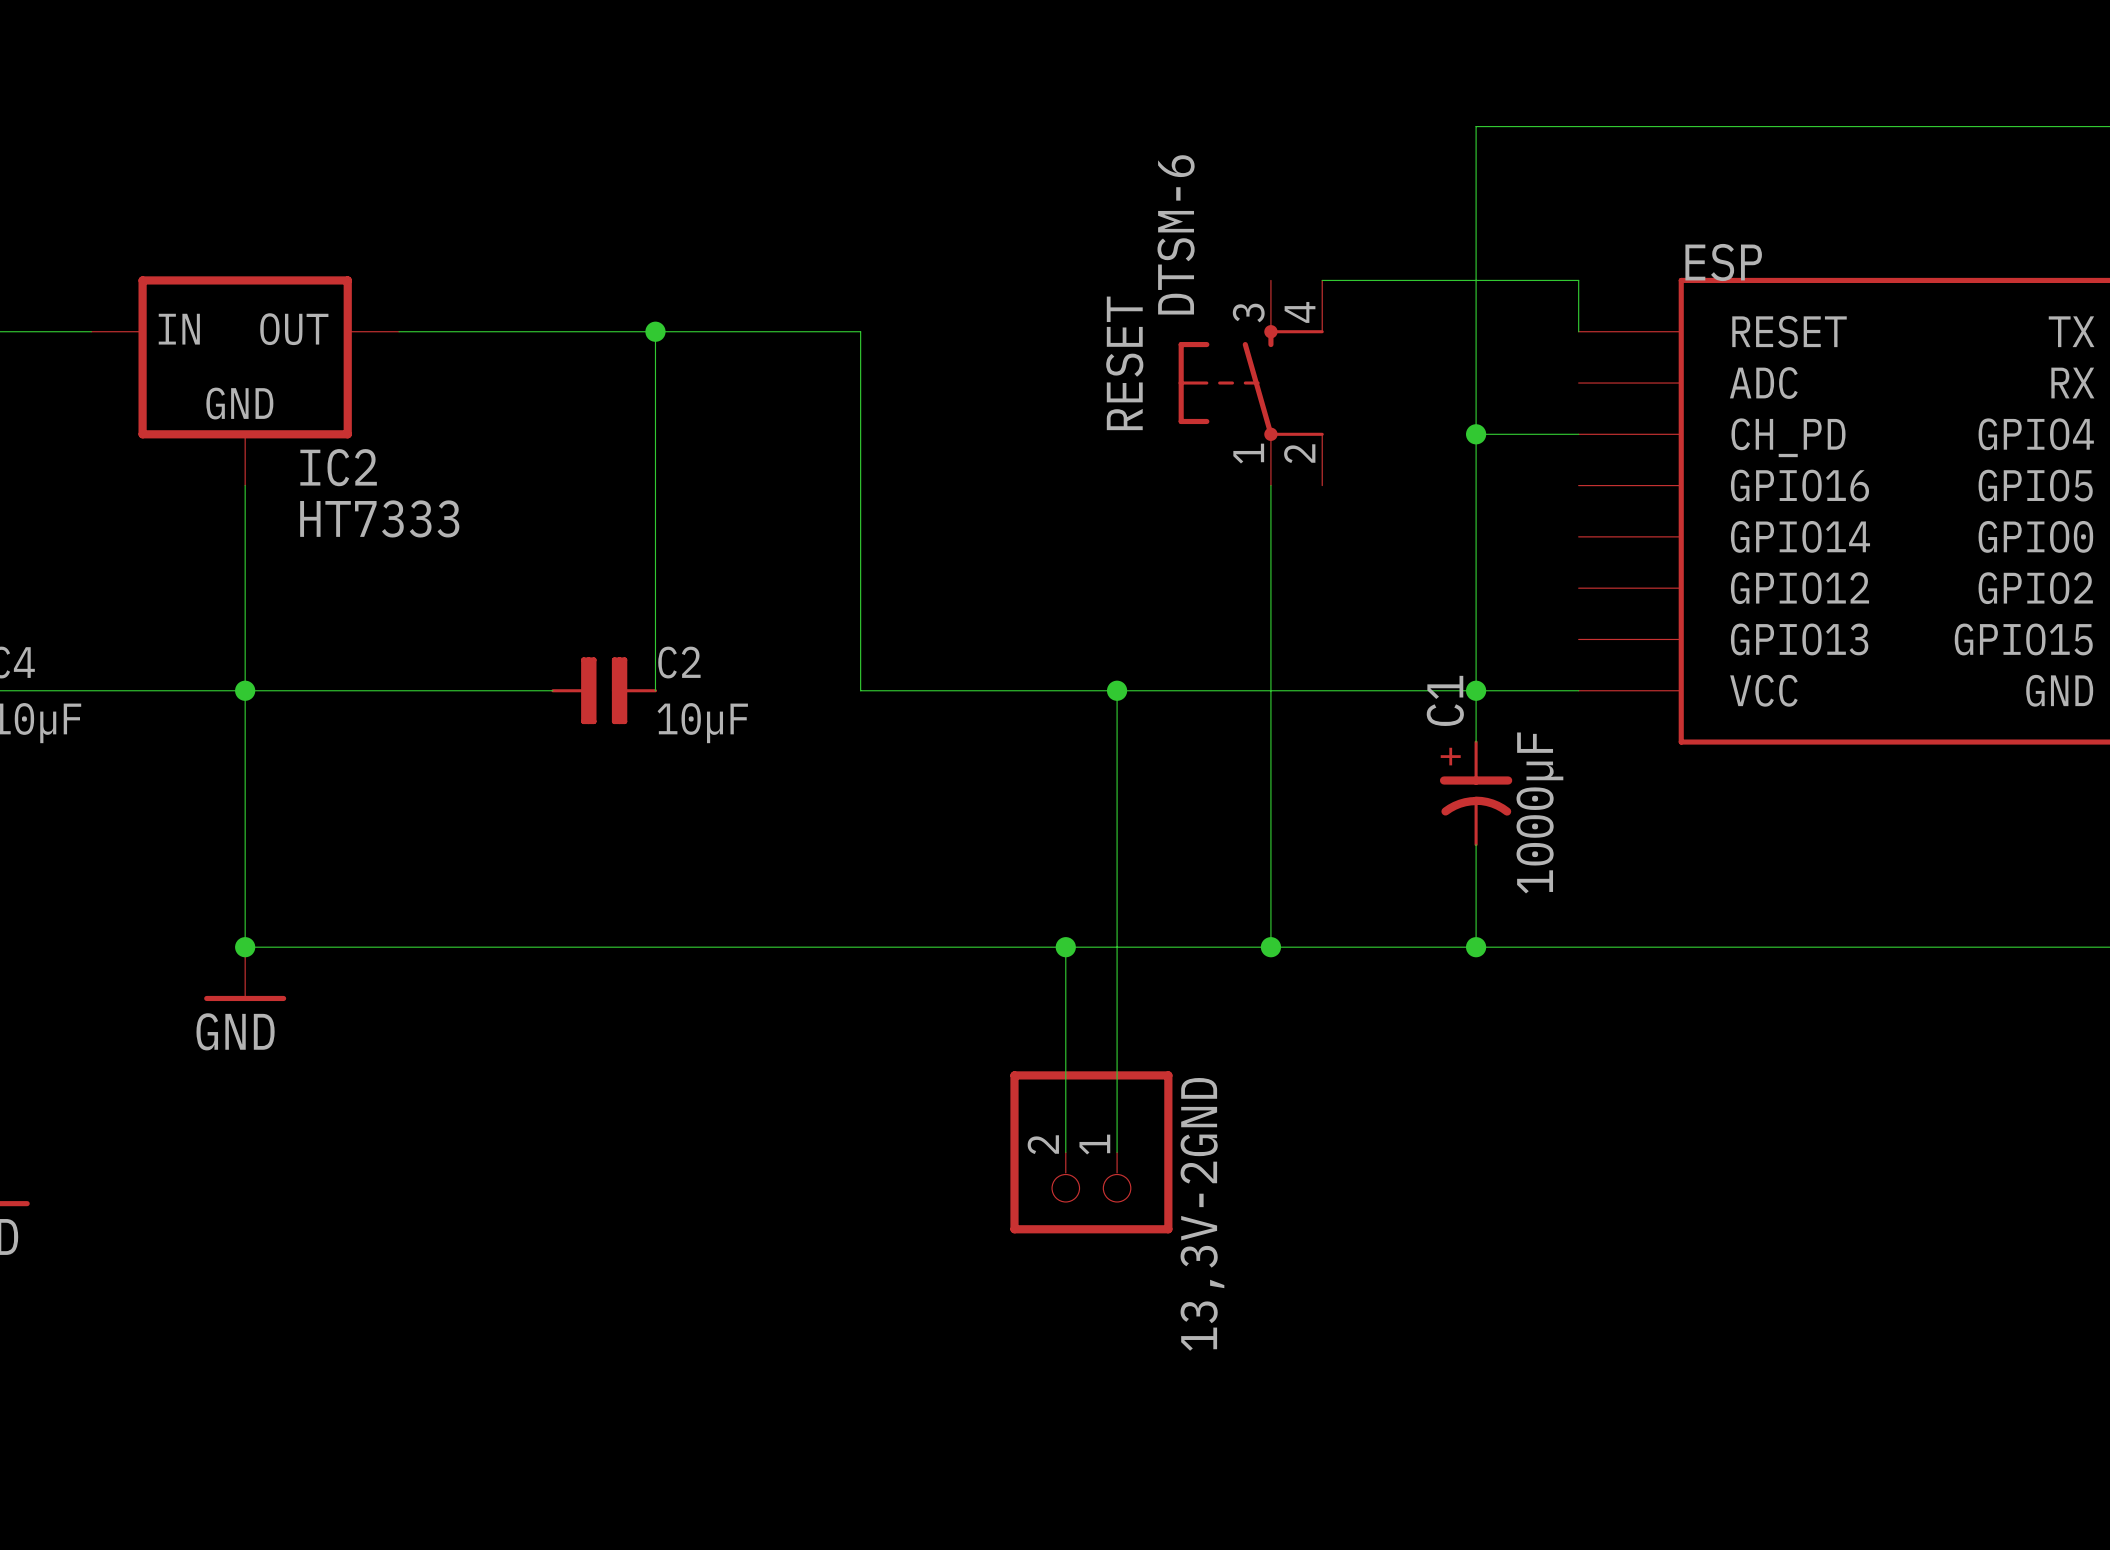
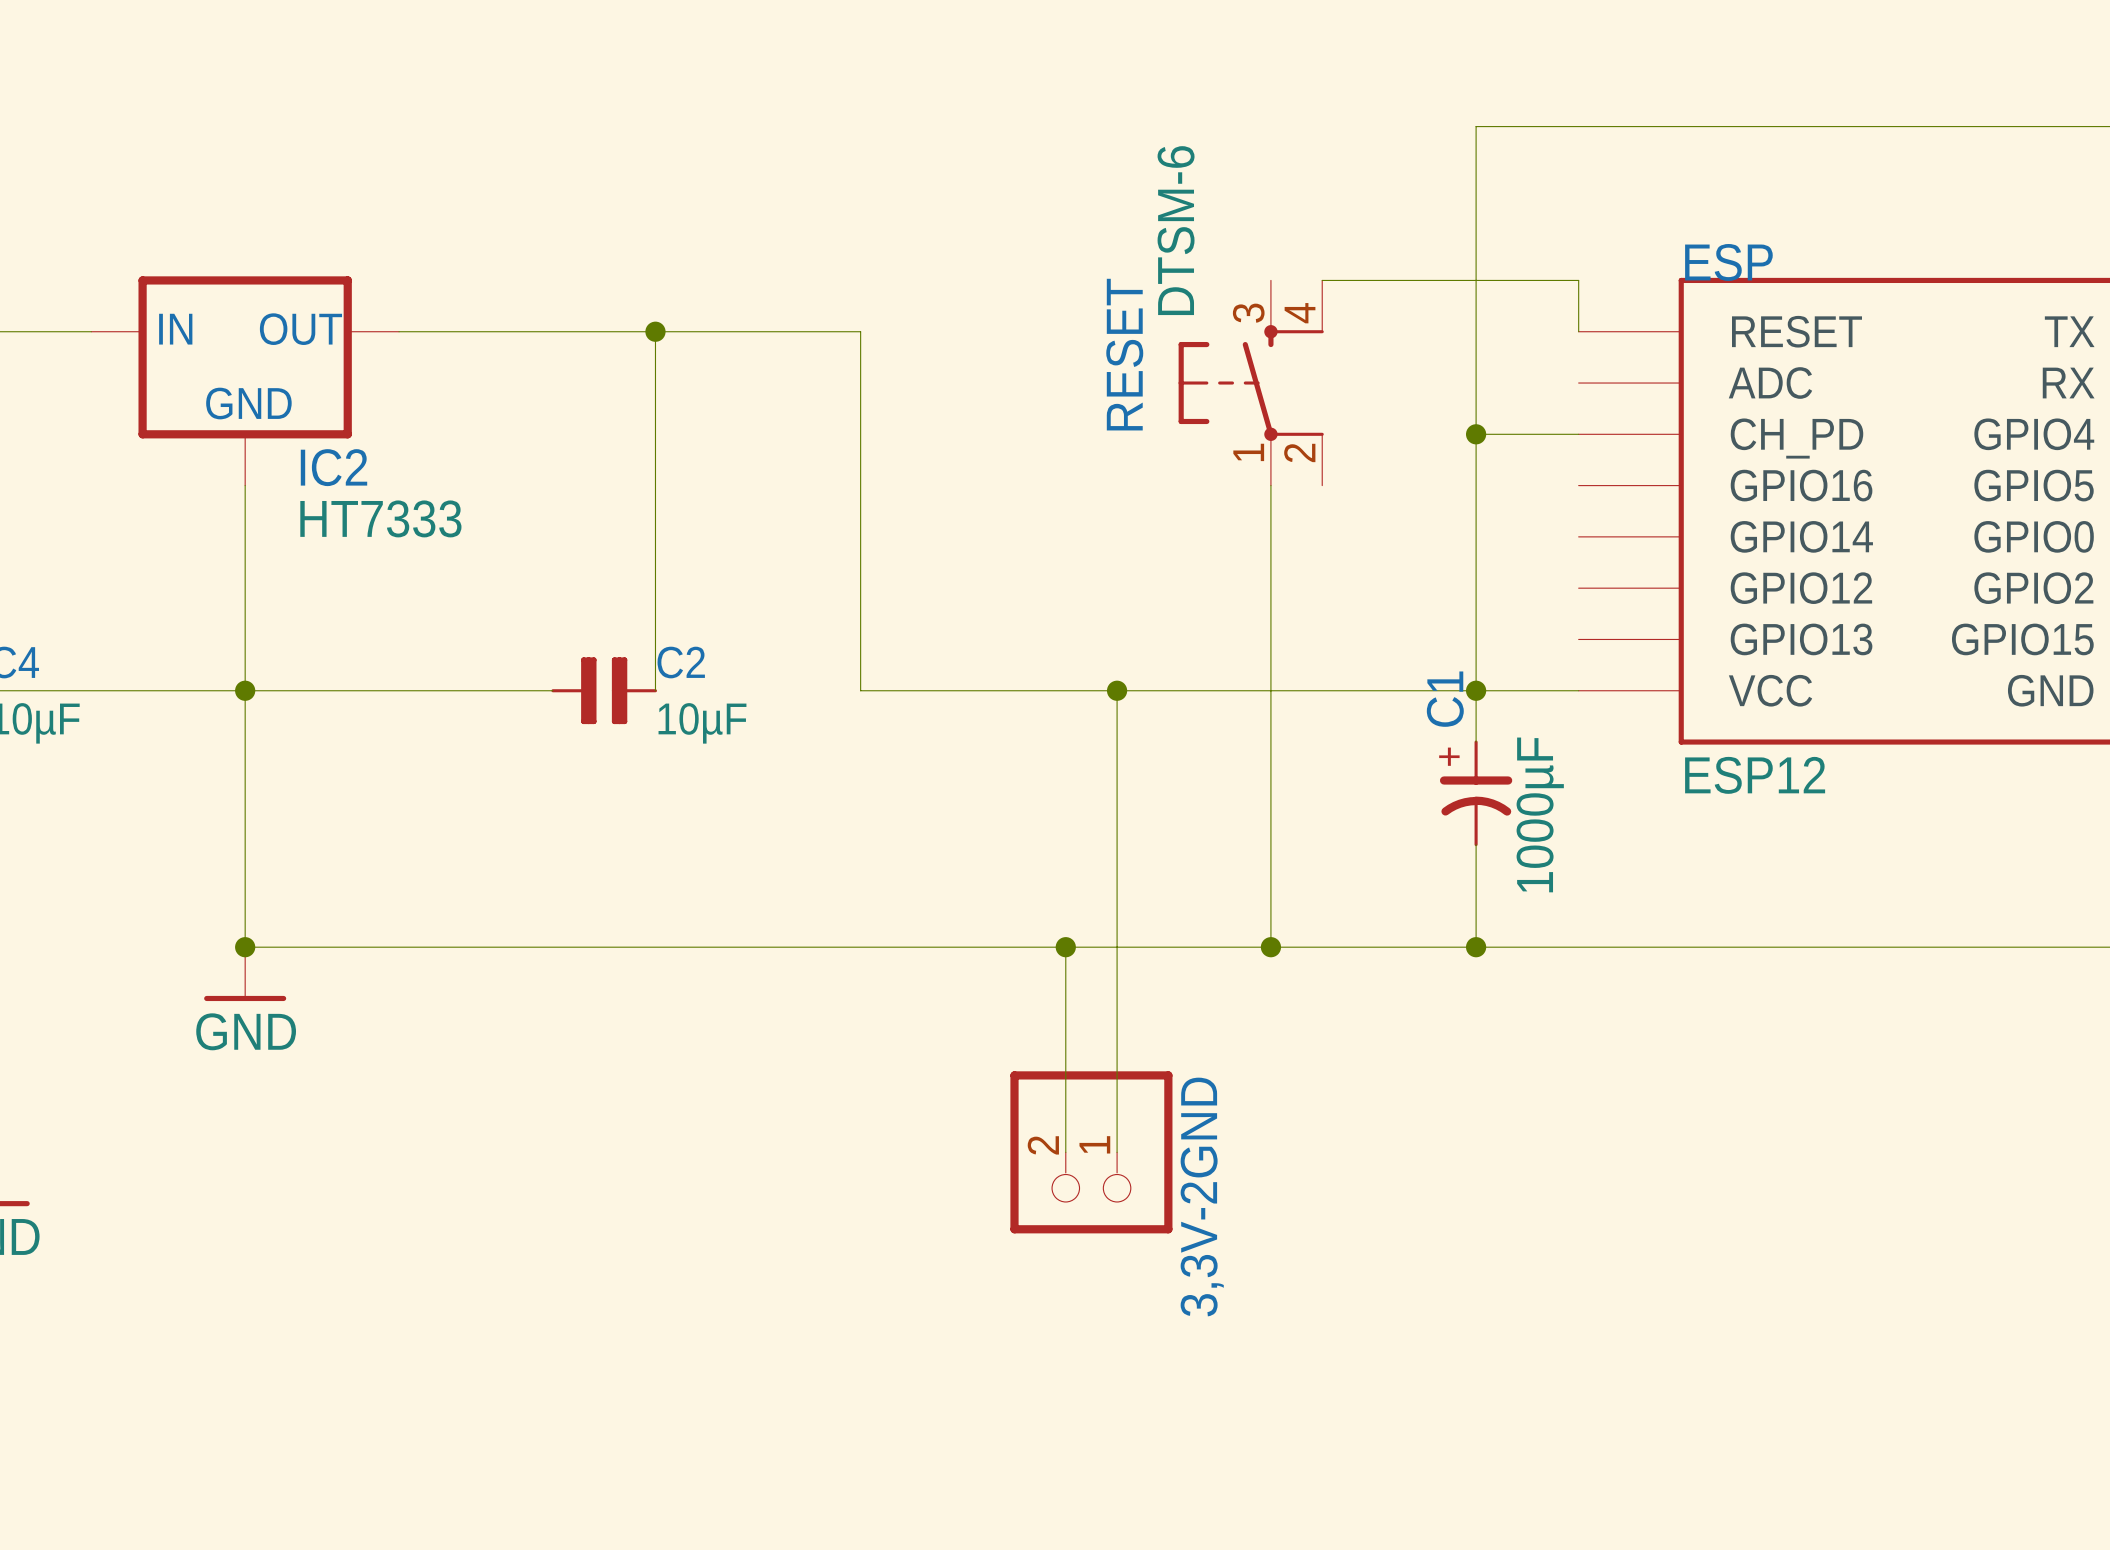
ESP value: none -> ESP12 (1755, 775)
13,3V-2GND name: 13,3V-2GND (1202, 1214) -> 3,3V-2GND (1202, 1197)

